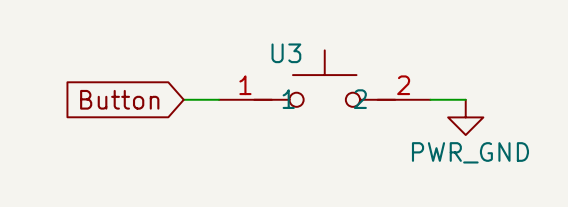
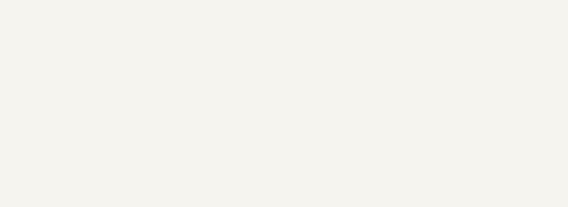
U3: (324, 78) -> none
global label: Button (119, 99) -> none
wire: (183, 99) (219, 99) -> none
wire: (430, 99) (465, 99) -> none
power symbol: PWR_GND (465, 117) -> none

